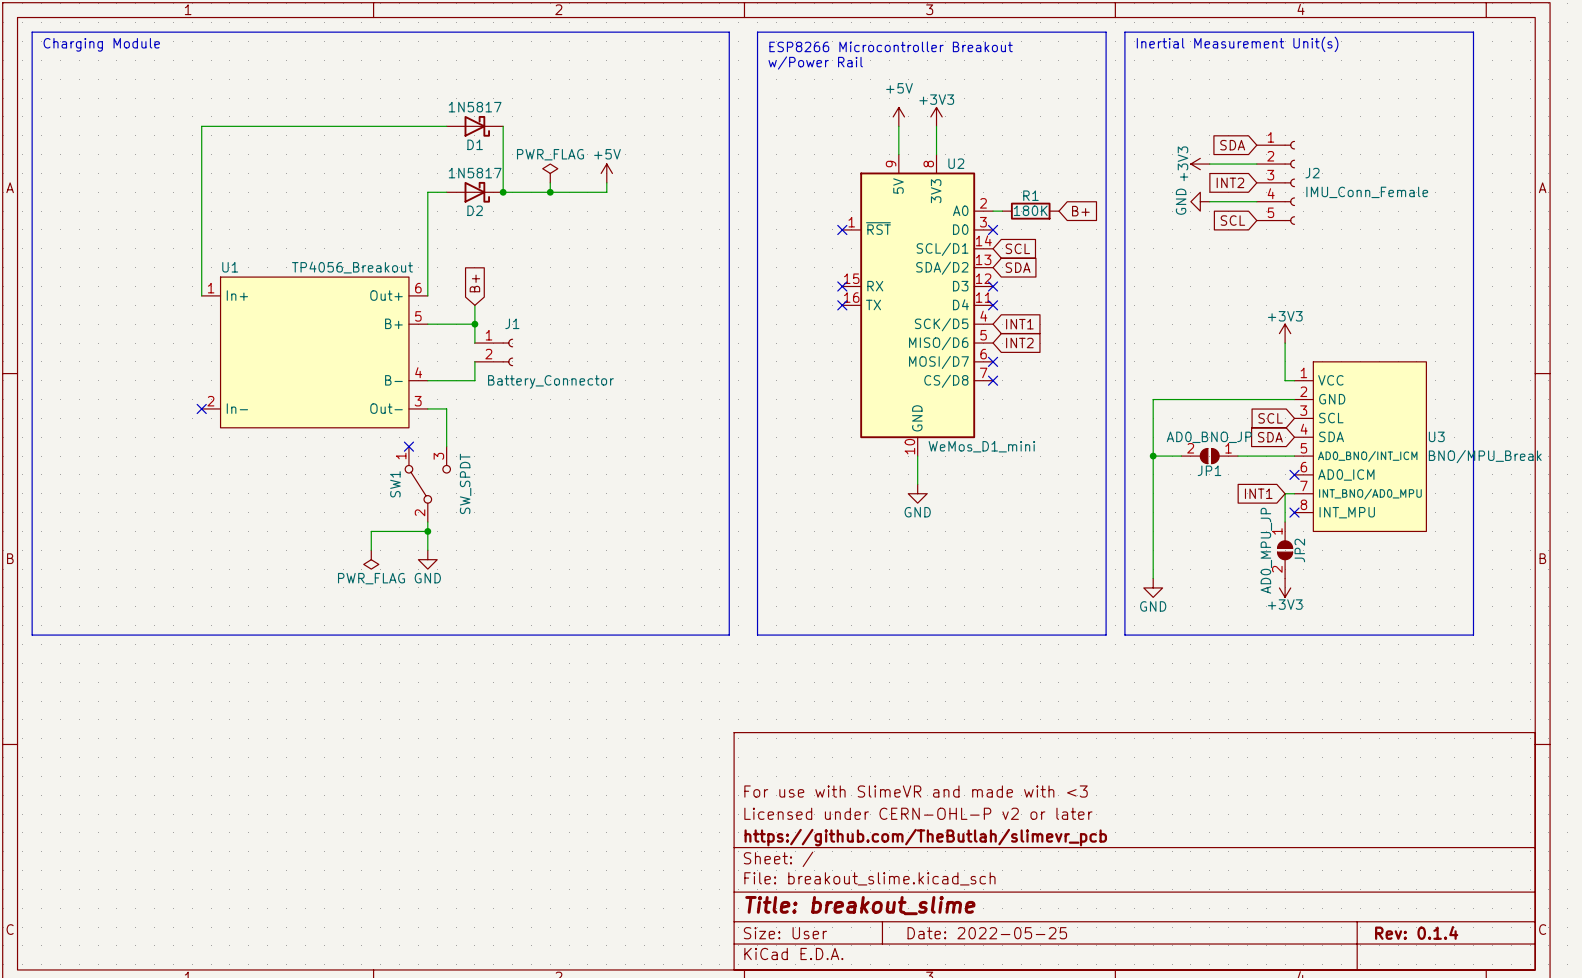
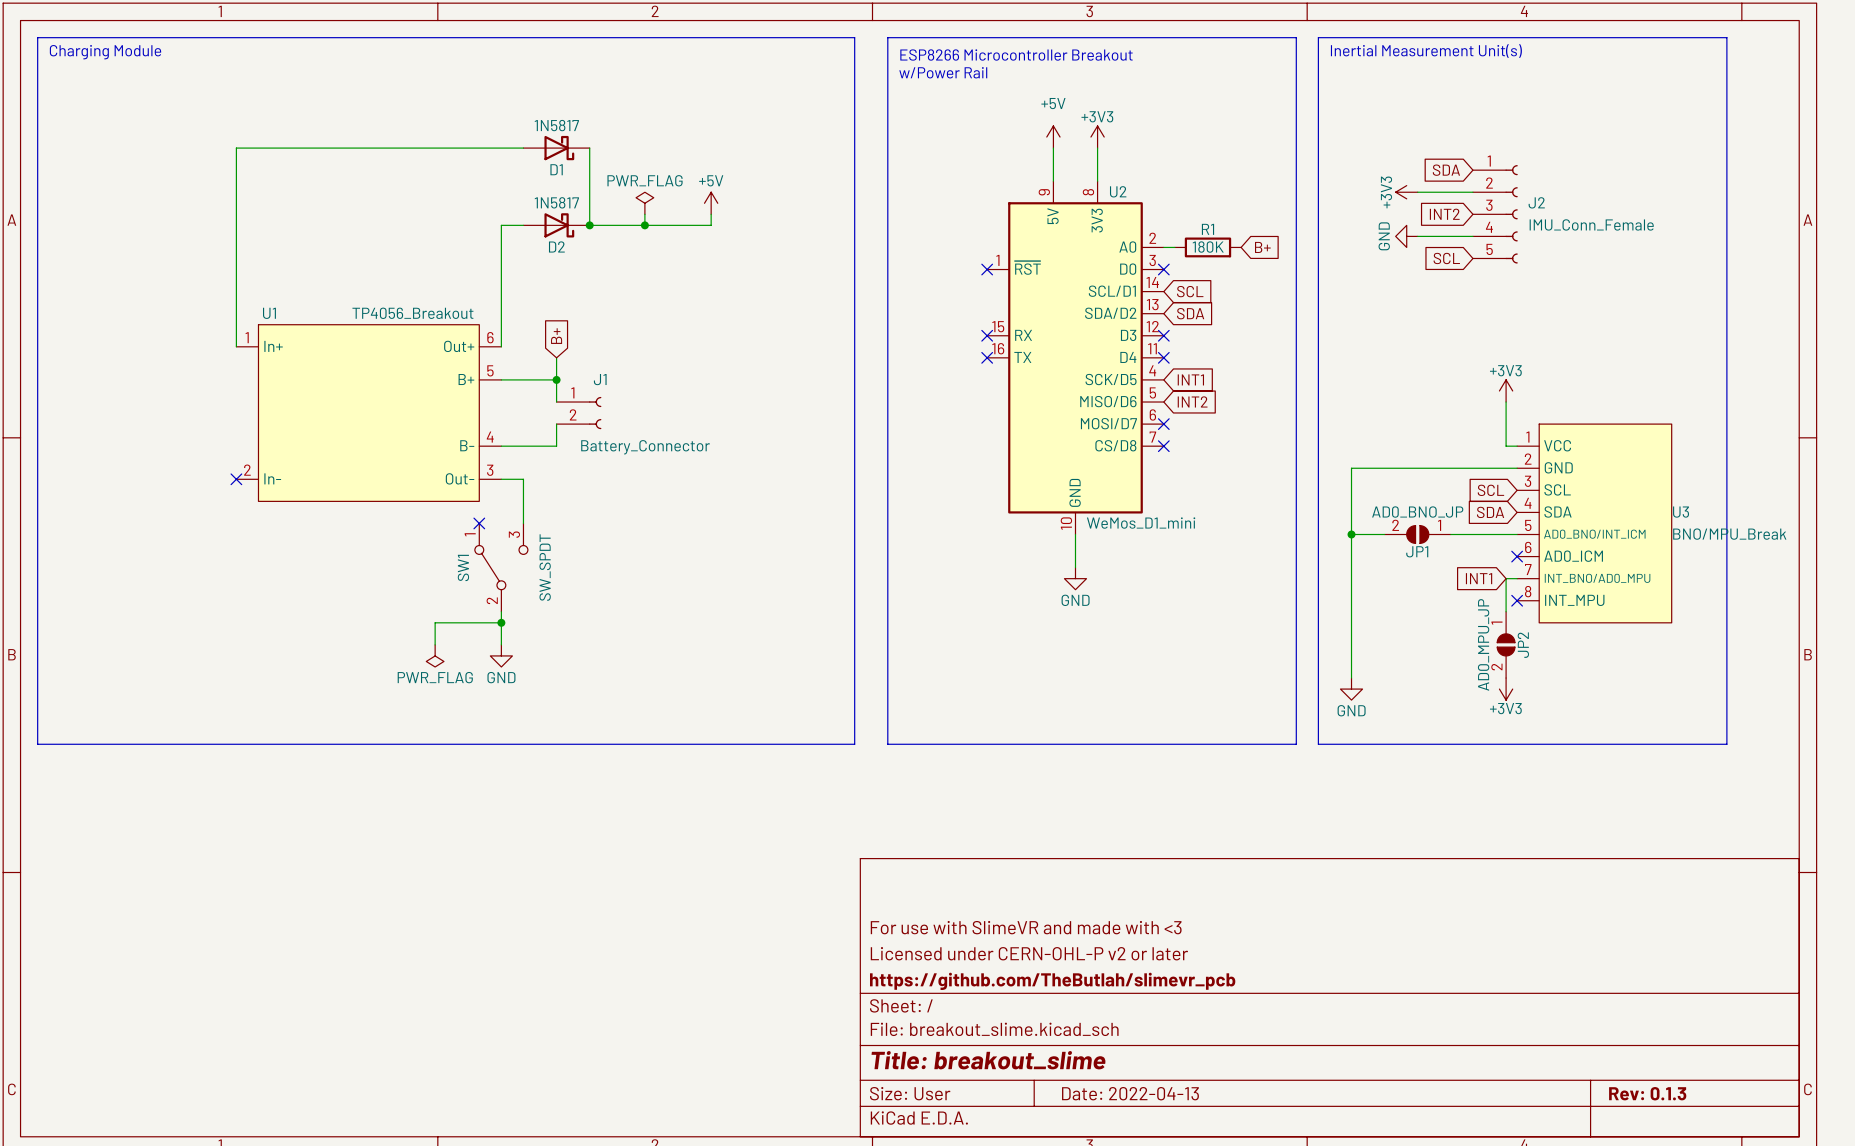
title block: Rev: 0.1.4 (1416, 932) -> Rev: 0.1.3 (1647, 1093)
title block: Date: 2022-05-25 (987, 933) -> Date: 2022-04-13 (1130, 1093)

